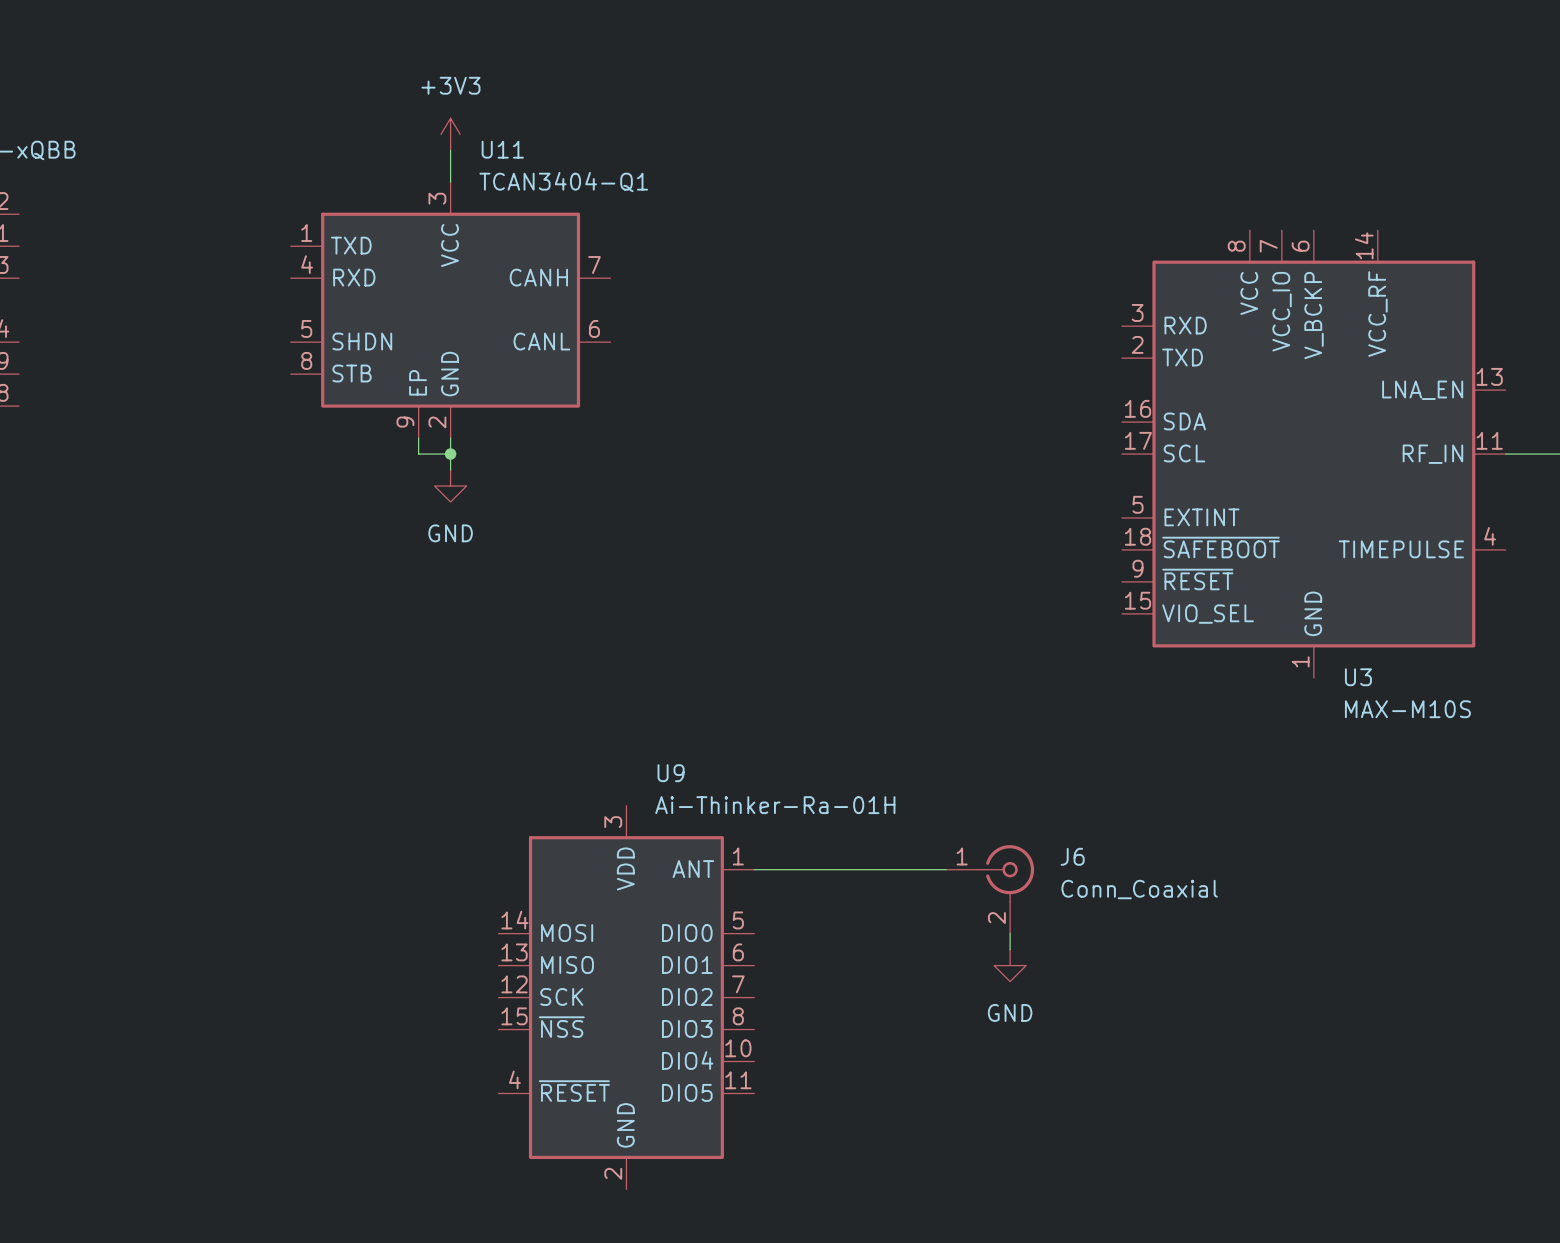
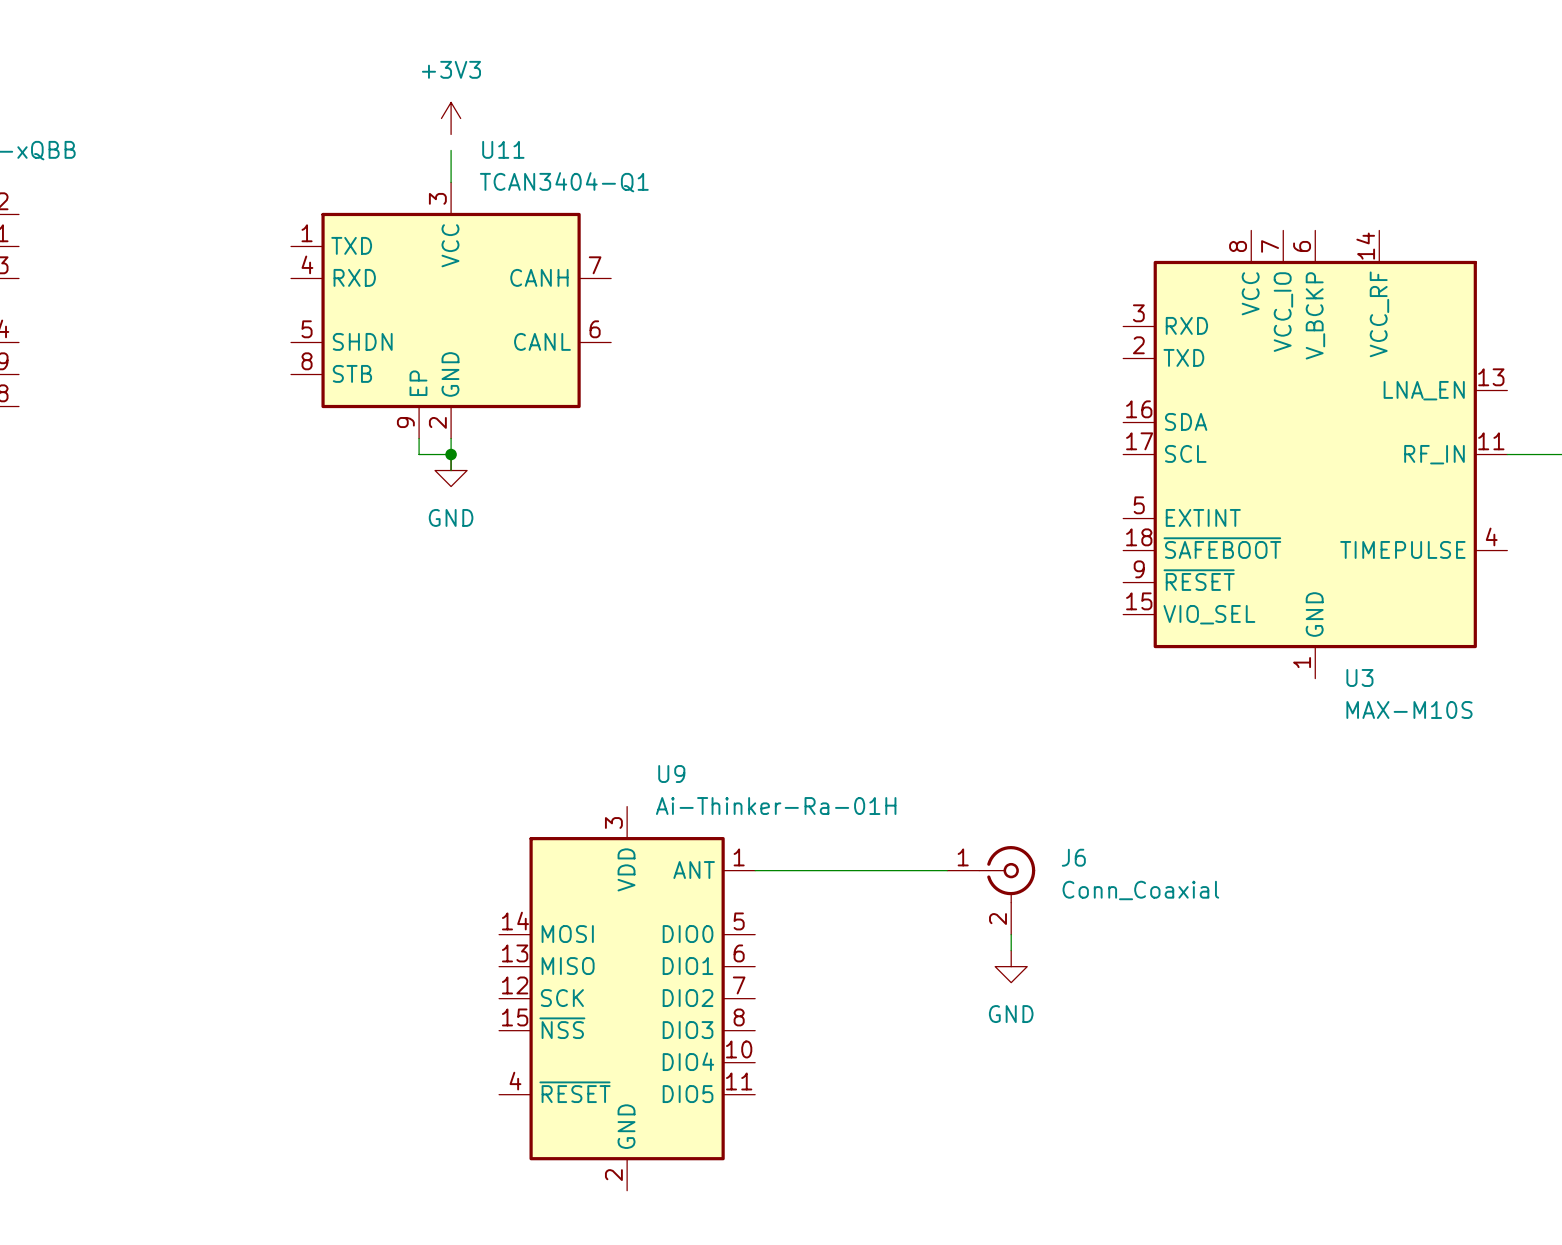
power symbol position: +3V3 (450, 134) -> +3V3 (451, 118)
power symbol position: GND (450, 486) -> GND (451, 470)

